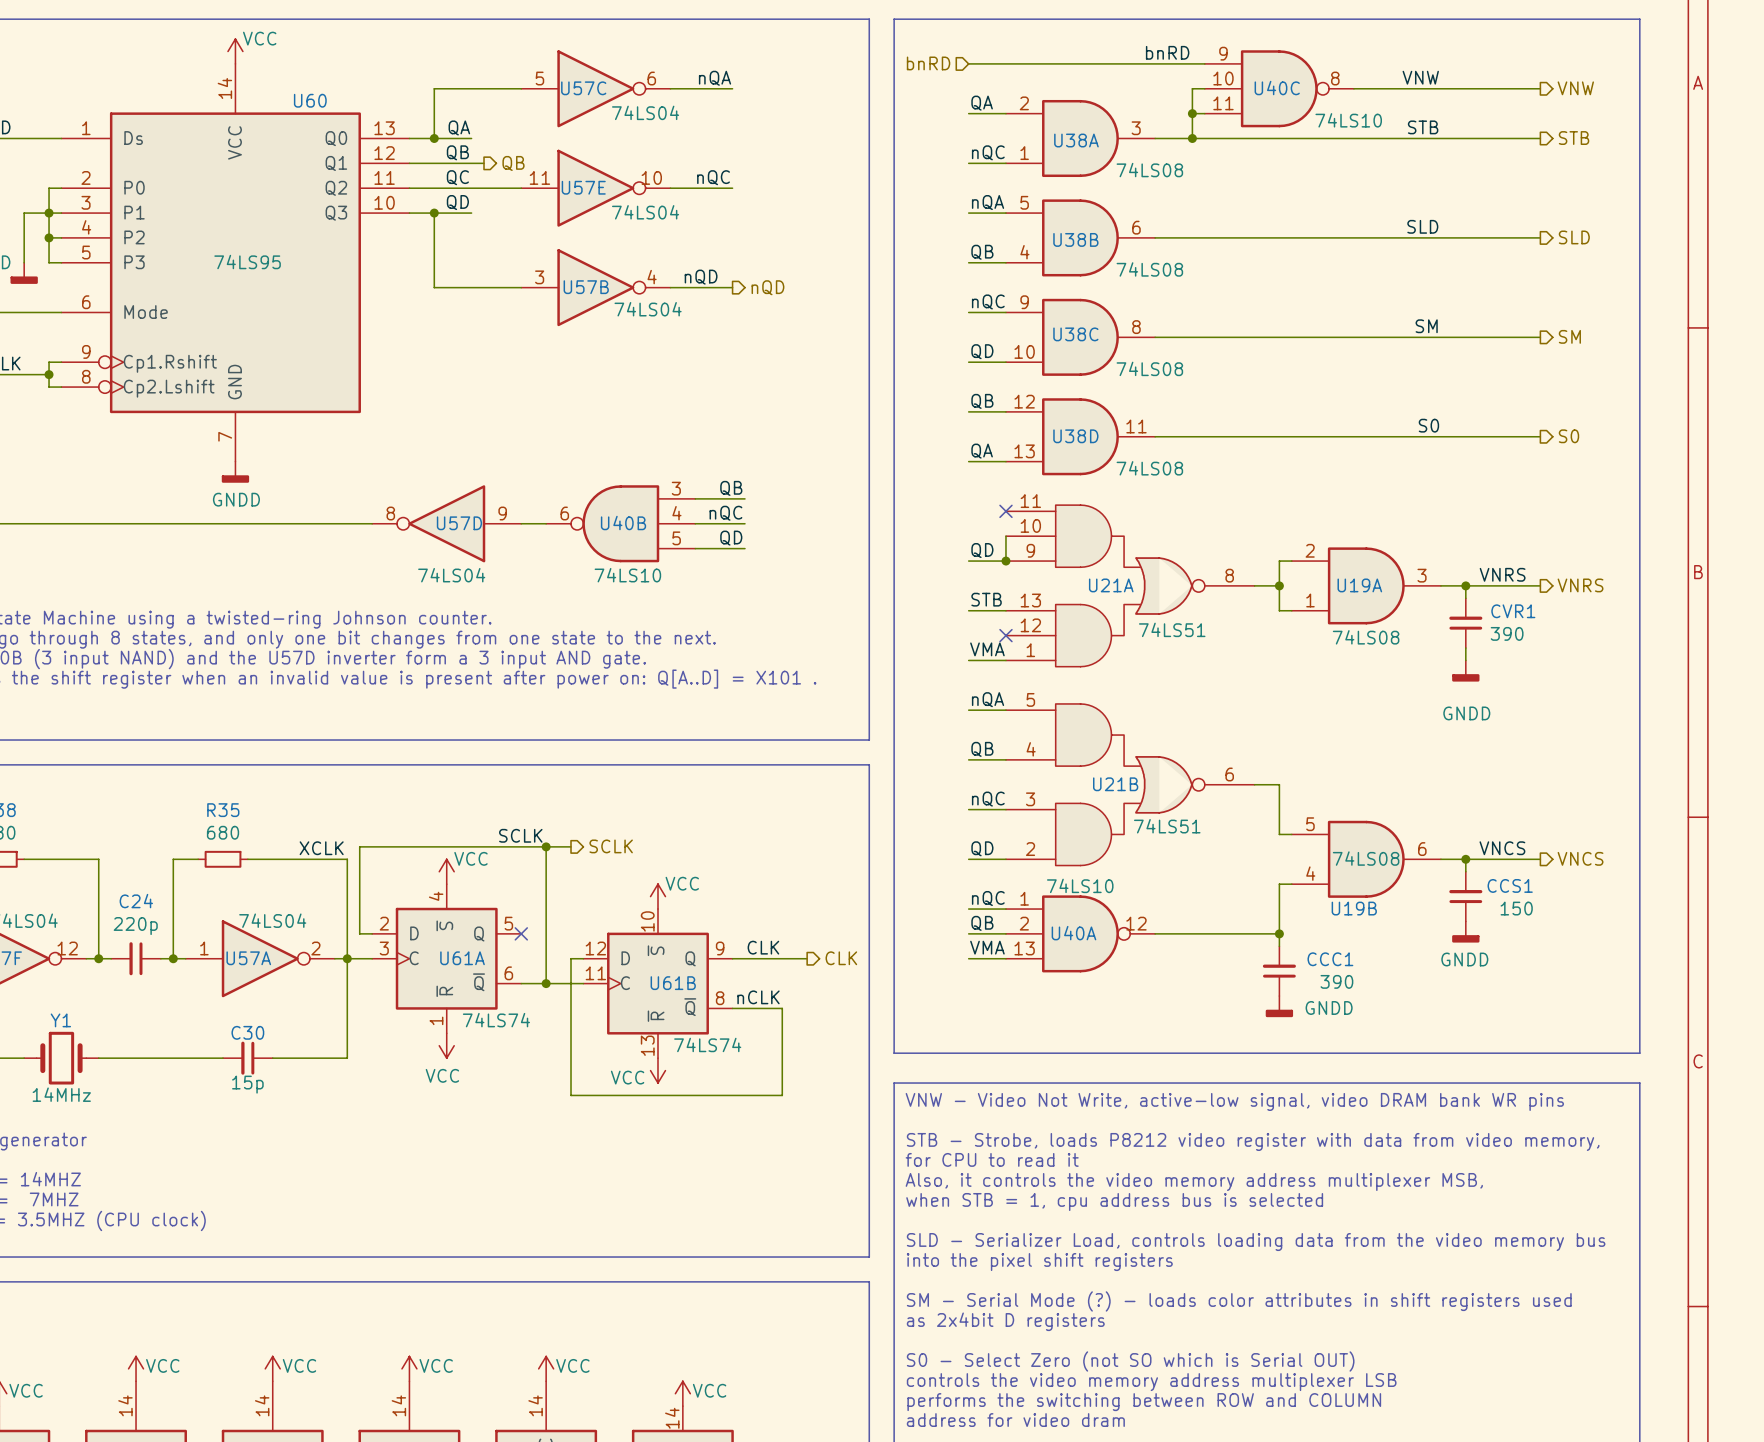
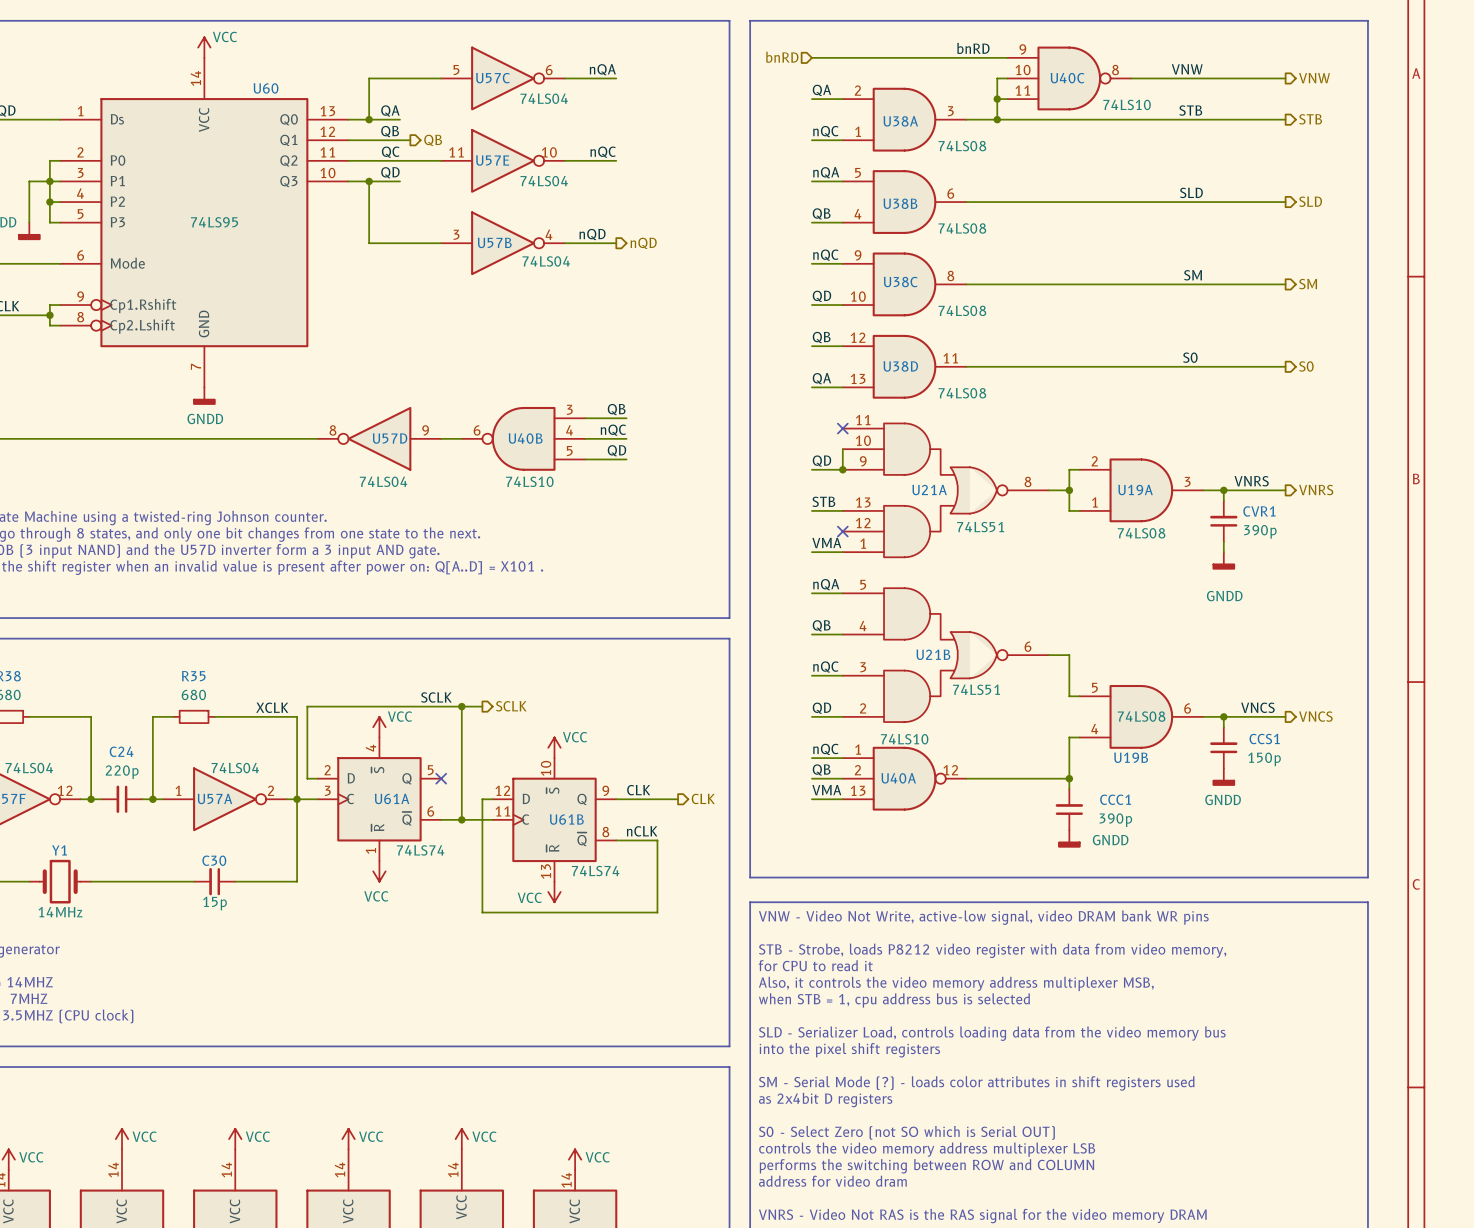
CVR1 value: 390 (1507, 633) -> 390p (1260, 531)
CCS1 value: 150 (1516, 908) -> 150p (1264, 759)
CCC1 value: 390 (1336, 981) -> 390p (1115, 820)

